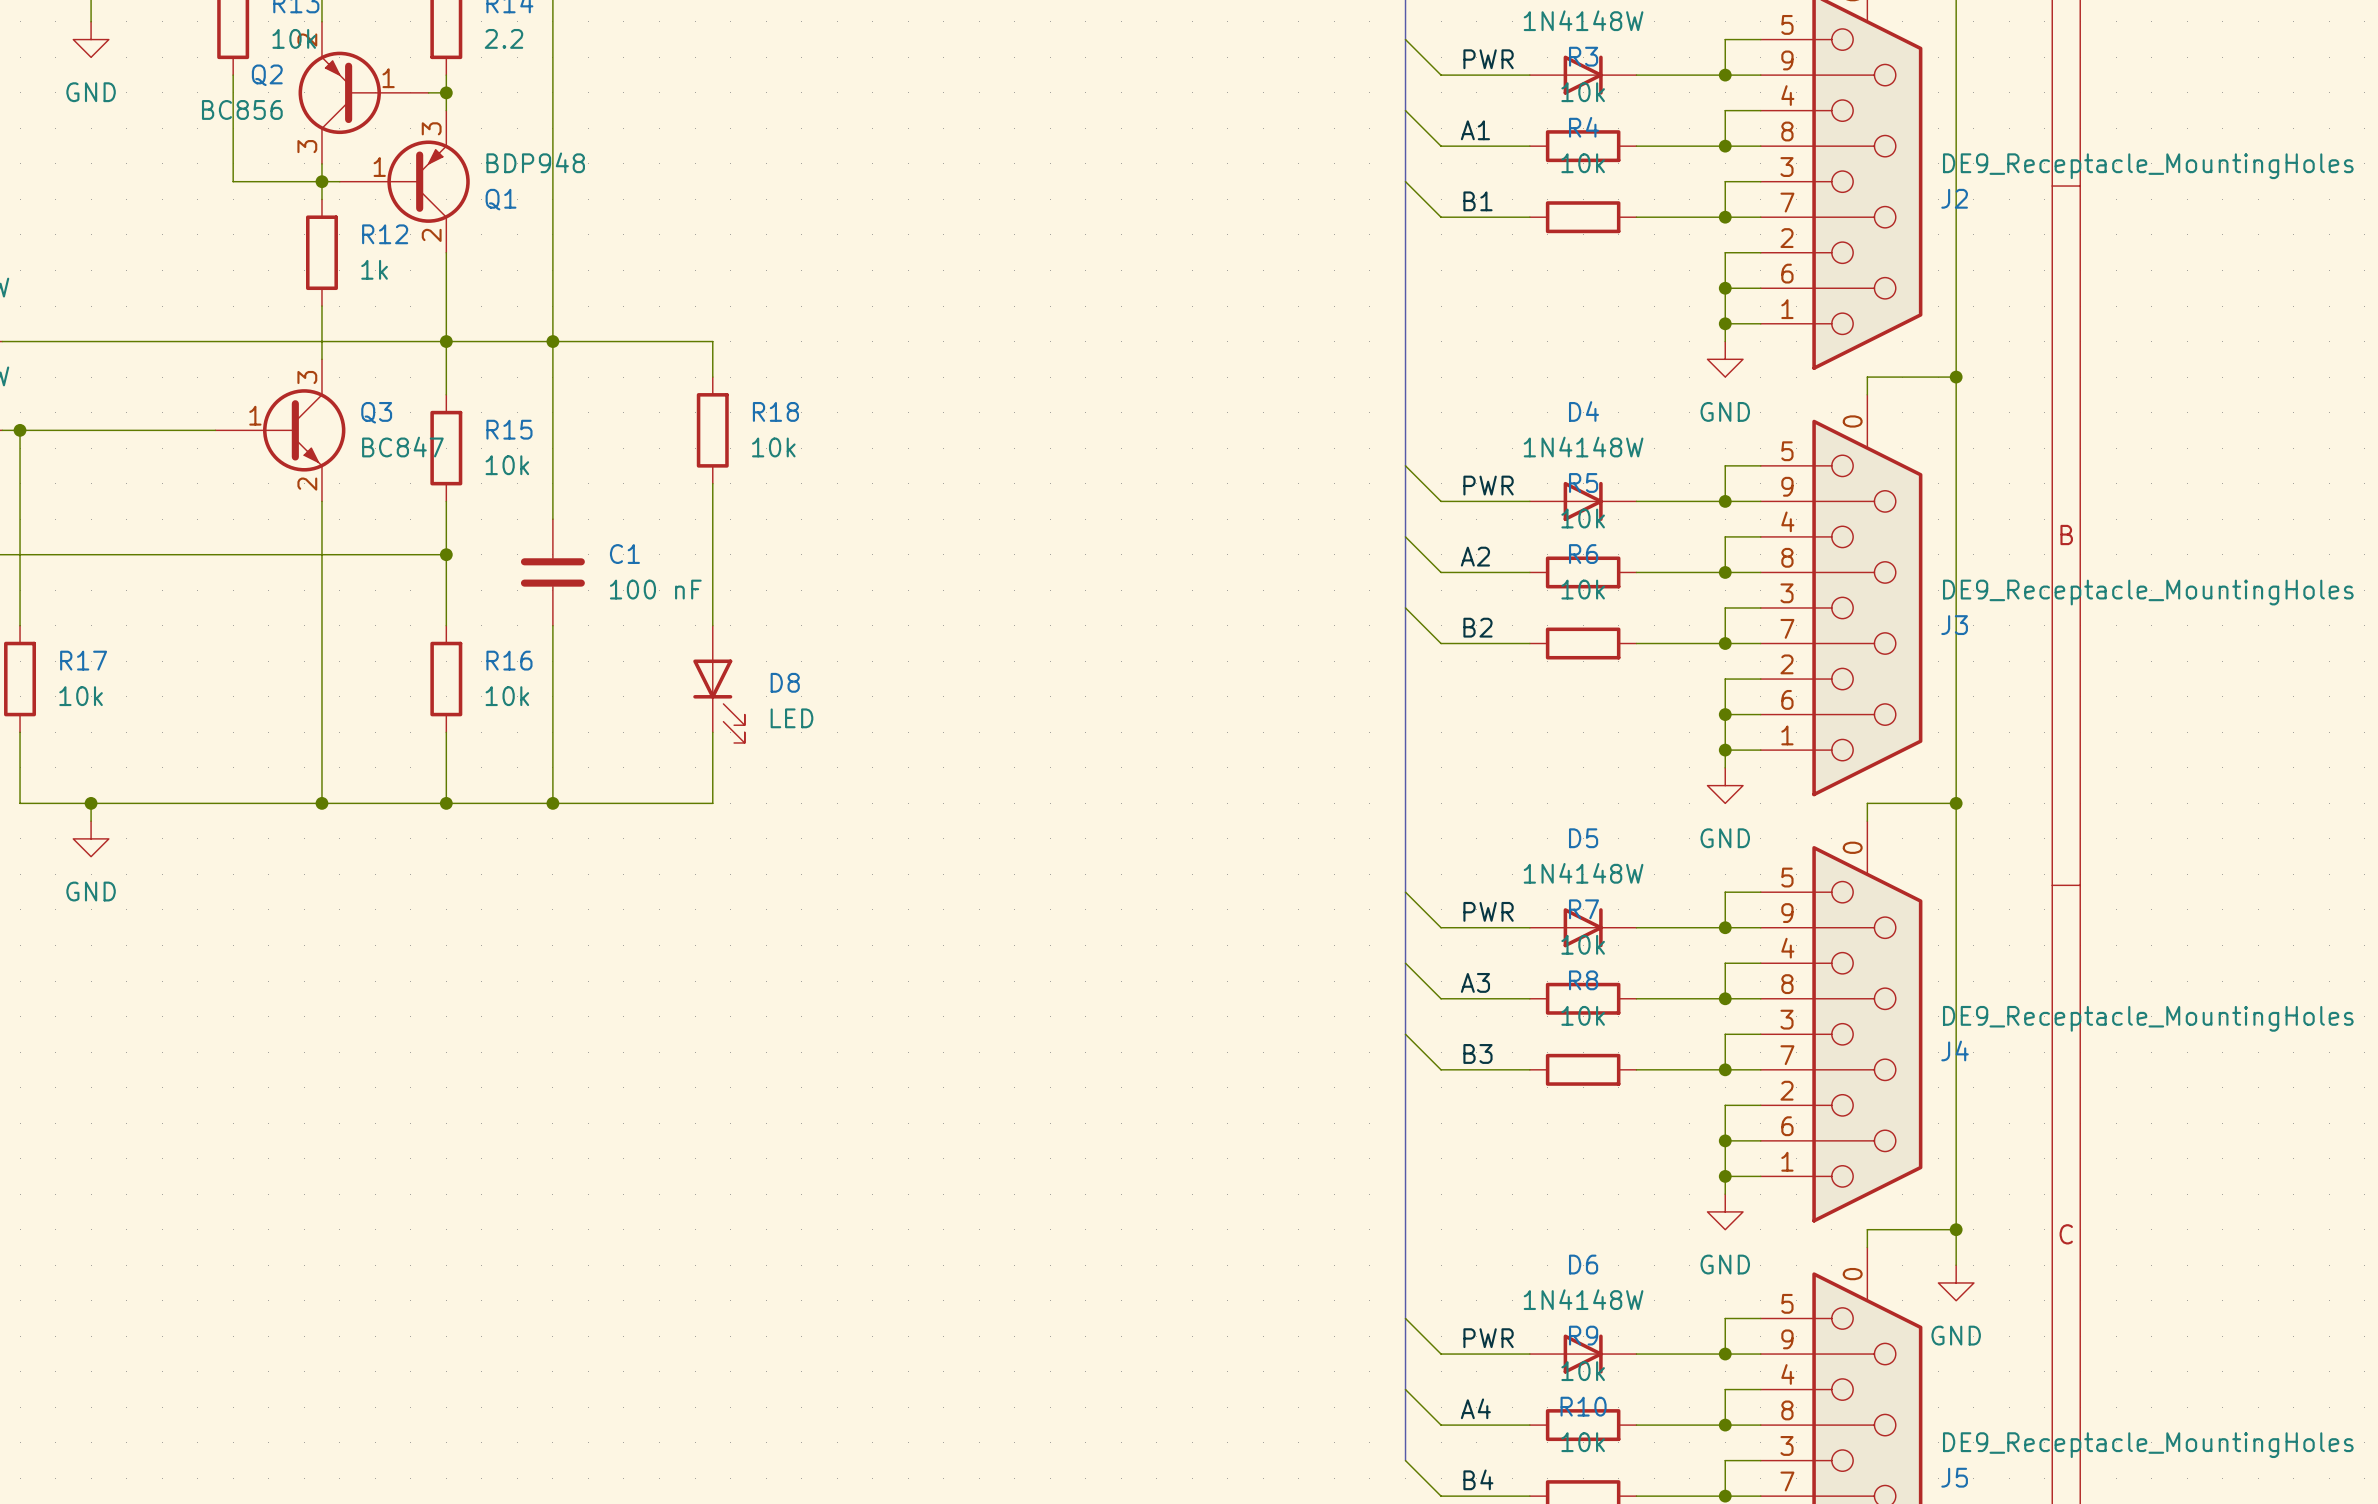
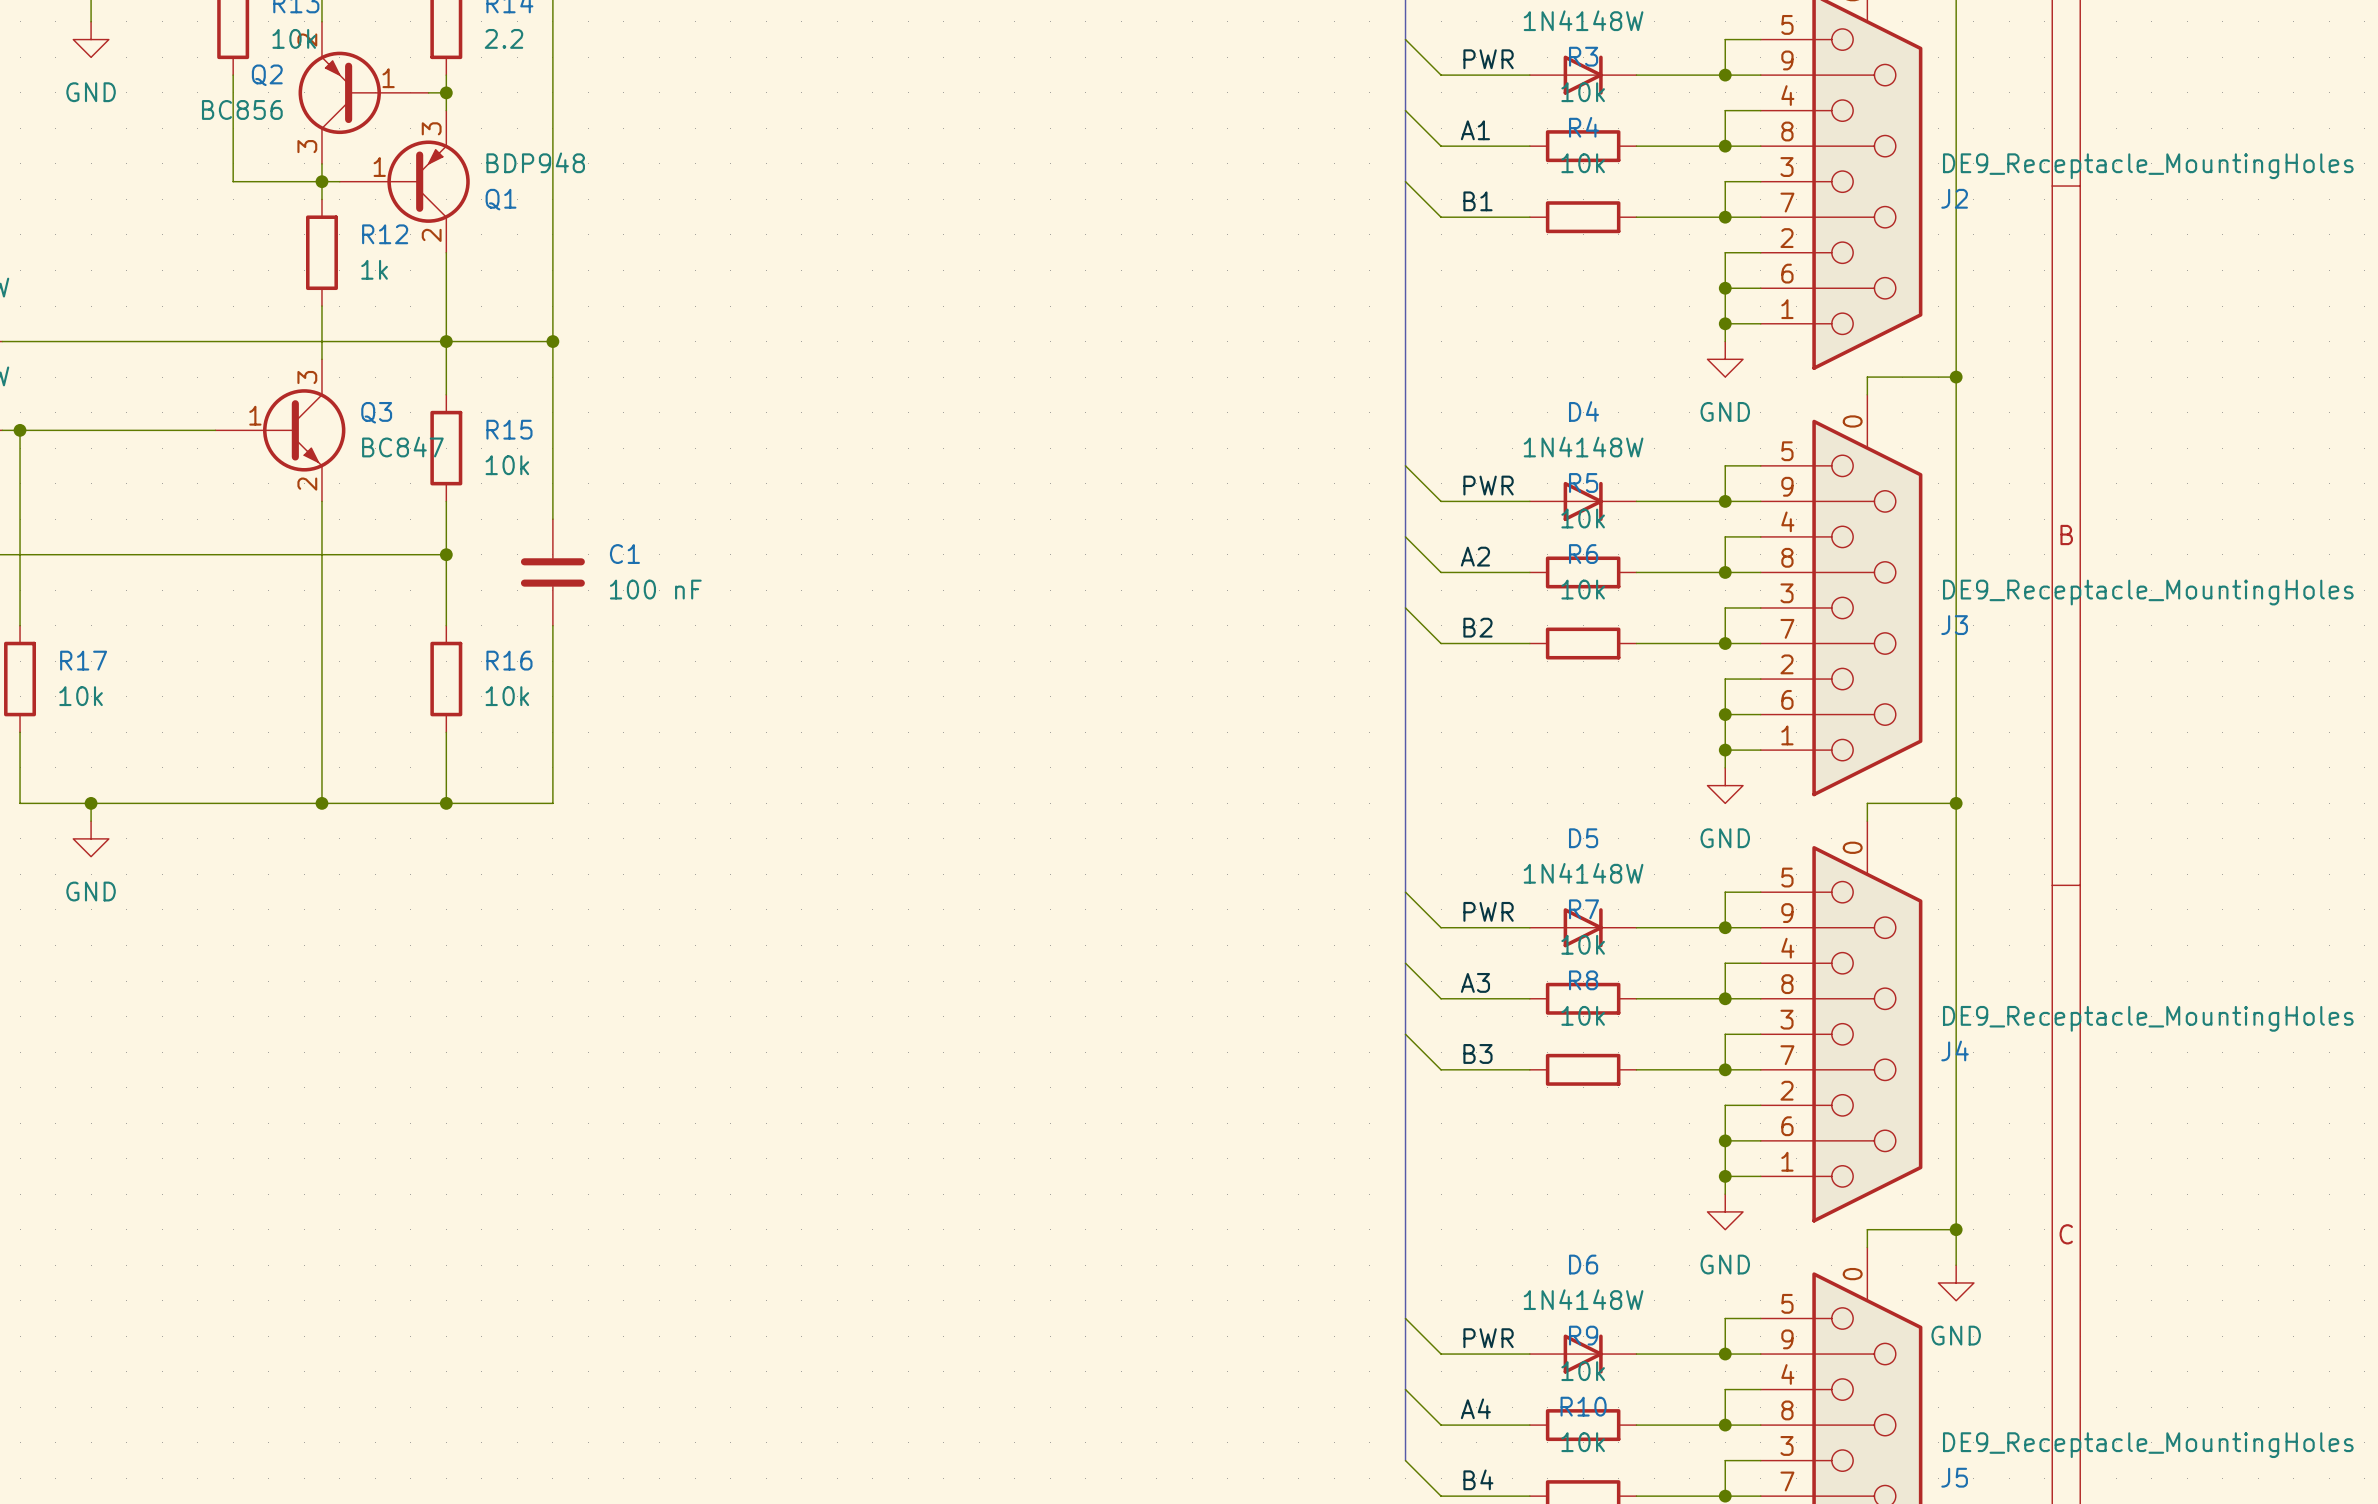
wire: (552, 341) (712, 341) (712, 377) -> none
R18: 10k (712, 430) -> none
wire: (712, 483) (712, 625) -> none
D8: LED (718, 684) -> none
wire: (712, 732) (712, 803) (552, 803) -> none
junction: (552, 803) -> none

